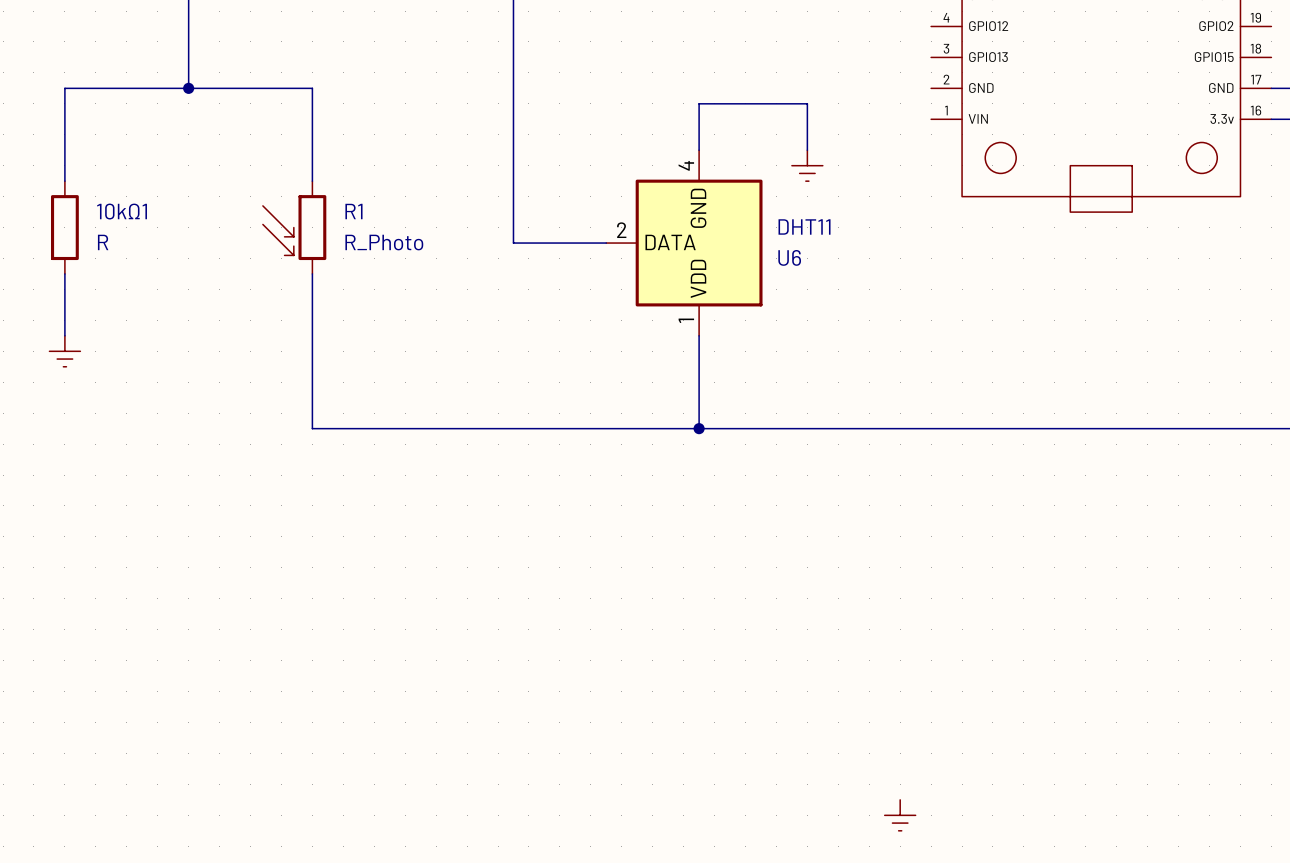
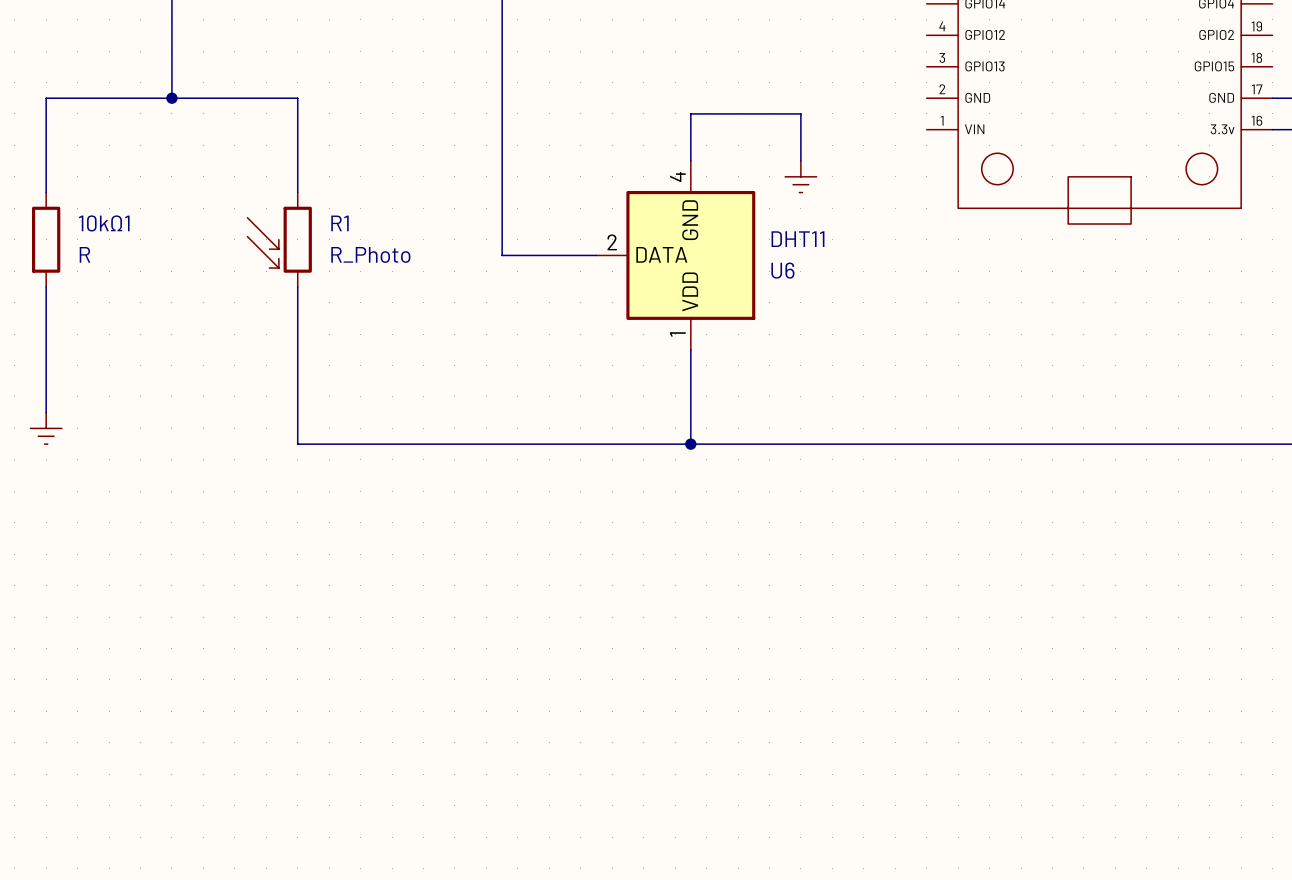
wire: none -> (46, 349) (46, 412)
power symbol position: (64, 351) -> (46, 428)
power symbol: (900, 815) -> none

